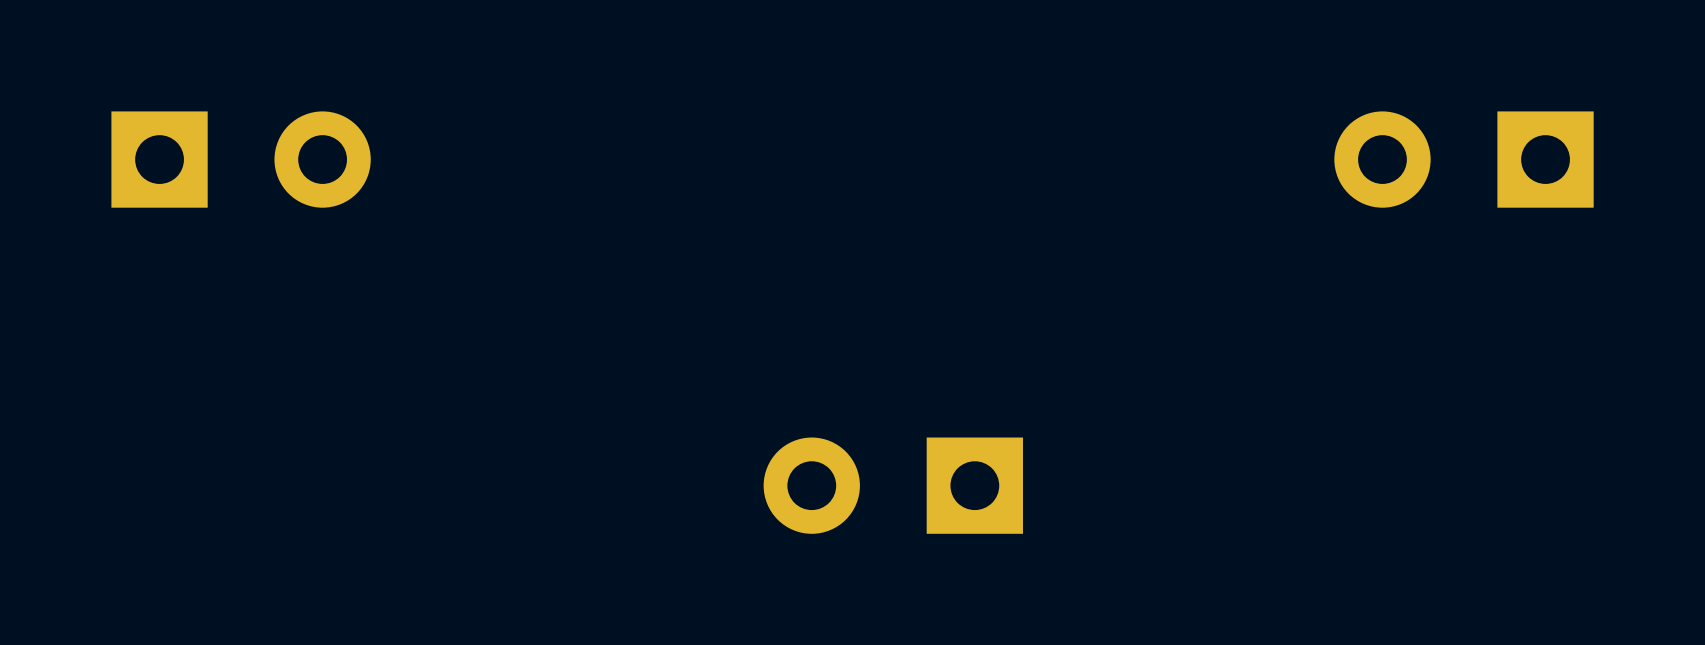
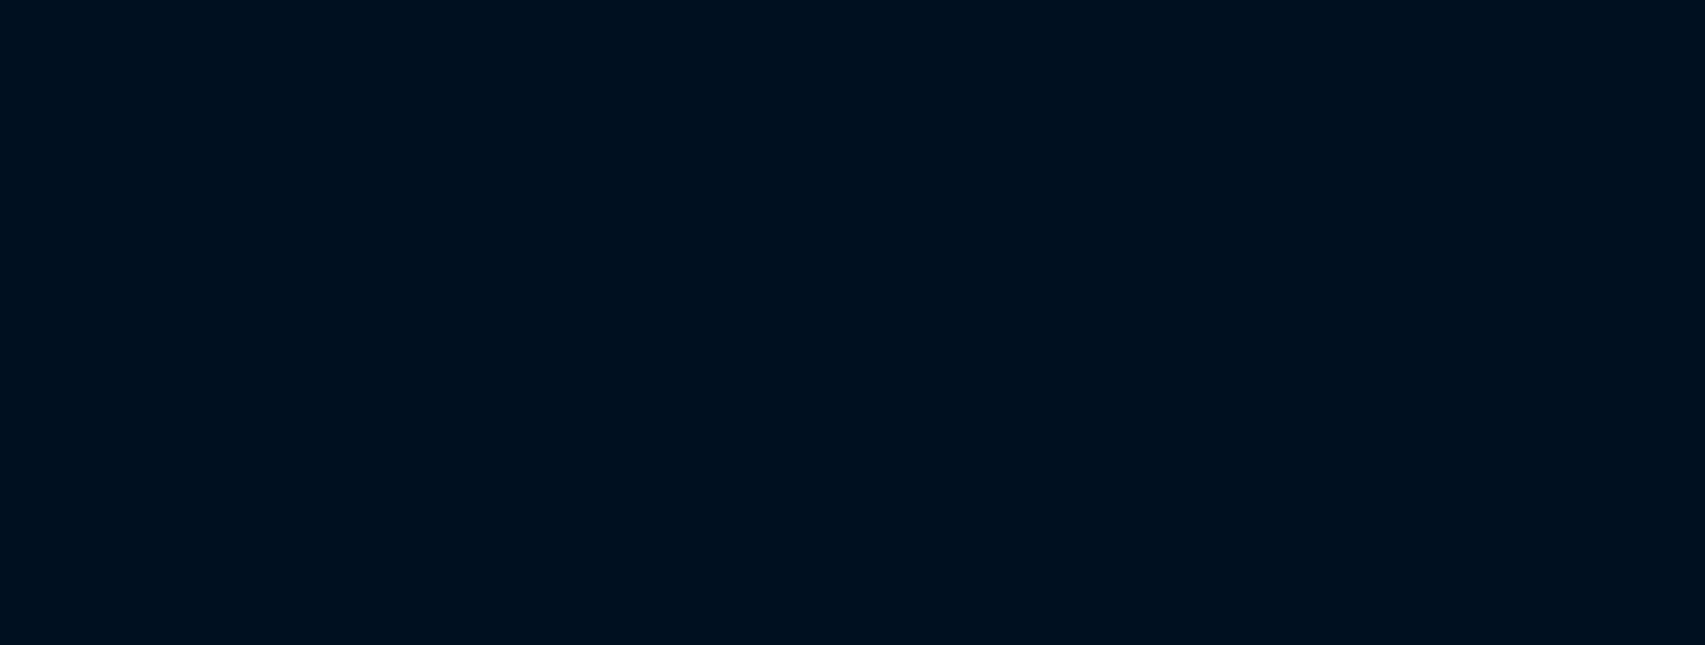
part: (241, 159) -> none
part: (1464, 159) -> none
part: (893, 485) -> none

